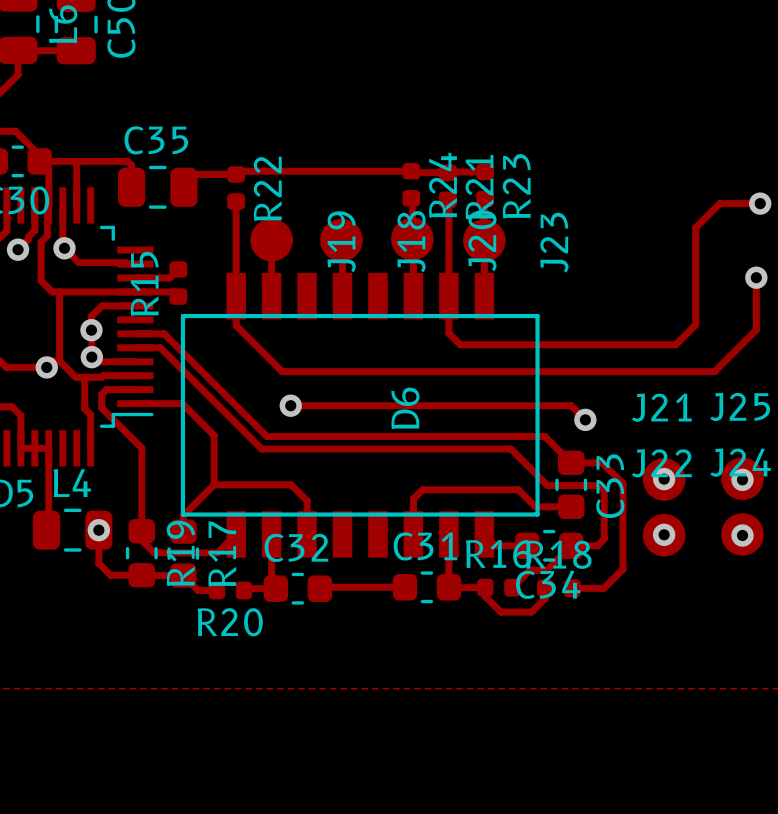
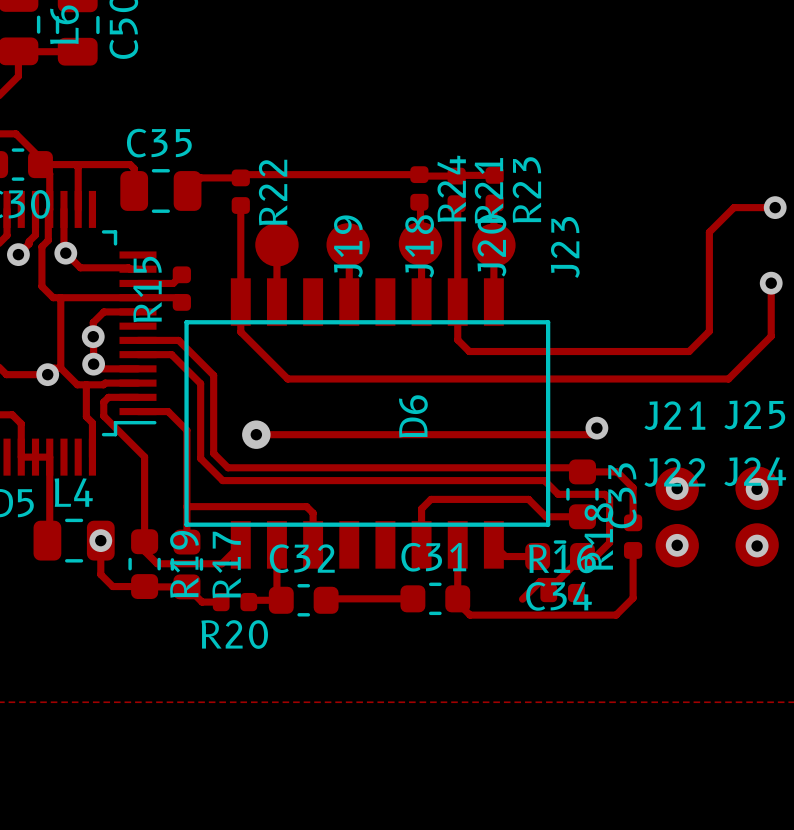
track: (164, 333) (266, 436) (544, 436) (567, 458) -> (167, 340) (178, 340) (213, 375) (213, 453) (228, 467) (578, 467)
track: (160, 347) (261, 448) (510, 448) (547, 485) (598, 485) (604, 490) (604, 539) (597, 545) (584, 545) -> (163, 354) (171, 354) (200, 383) (200, 458) (222, 480) (544, 480) (558, 494) (604, 494) (609, 499) (609, 542) (595, 556)
track: (164, 403) (182, 403) (214, 435) (214, 484) -> (168, 411) (186, 430) (186, 525)
track: (290, 405) (571, 405) (585, 419) -> (256, 434) (590, 434) (596, 428)
via: (290, 405) -> none
via: none -> (256, 434)
track: (602, 462) (623, 483) (623, 569) (603, 588) (572, 588) -> (613, 471) (617, 471) (633, 487) (633, 522)
track: (214, 484) (291, 484) (307, 500) (307, 503) -> (186, 506) (306, 506) (313, 513)
track: (214, 484) (183, 515) -> none
track: (449, 587) (485, 587) (485, 596) (500, 612) (531, 612) (545, 598) (545, 588) -> (457, 598) (457, 602) (470, 615) (616, 615) (633, 598) (633, 550)
R16 position: (498, 587) -> (562, 593)
R18 rotation: 0° (558, 588) -> 90° clockwise (633, 536)
R18 position: (558, 588) -> (633, 536)

